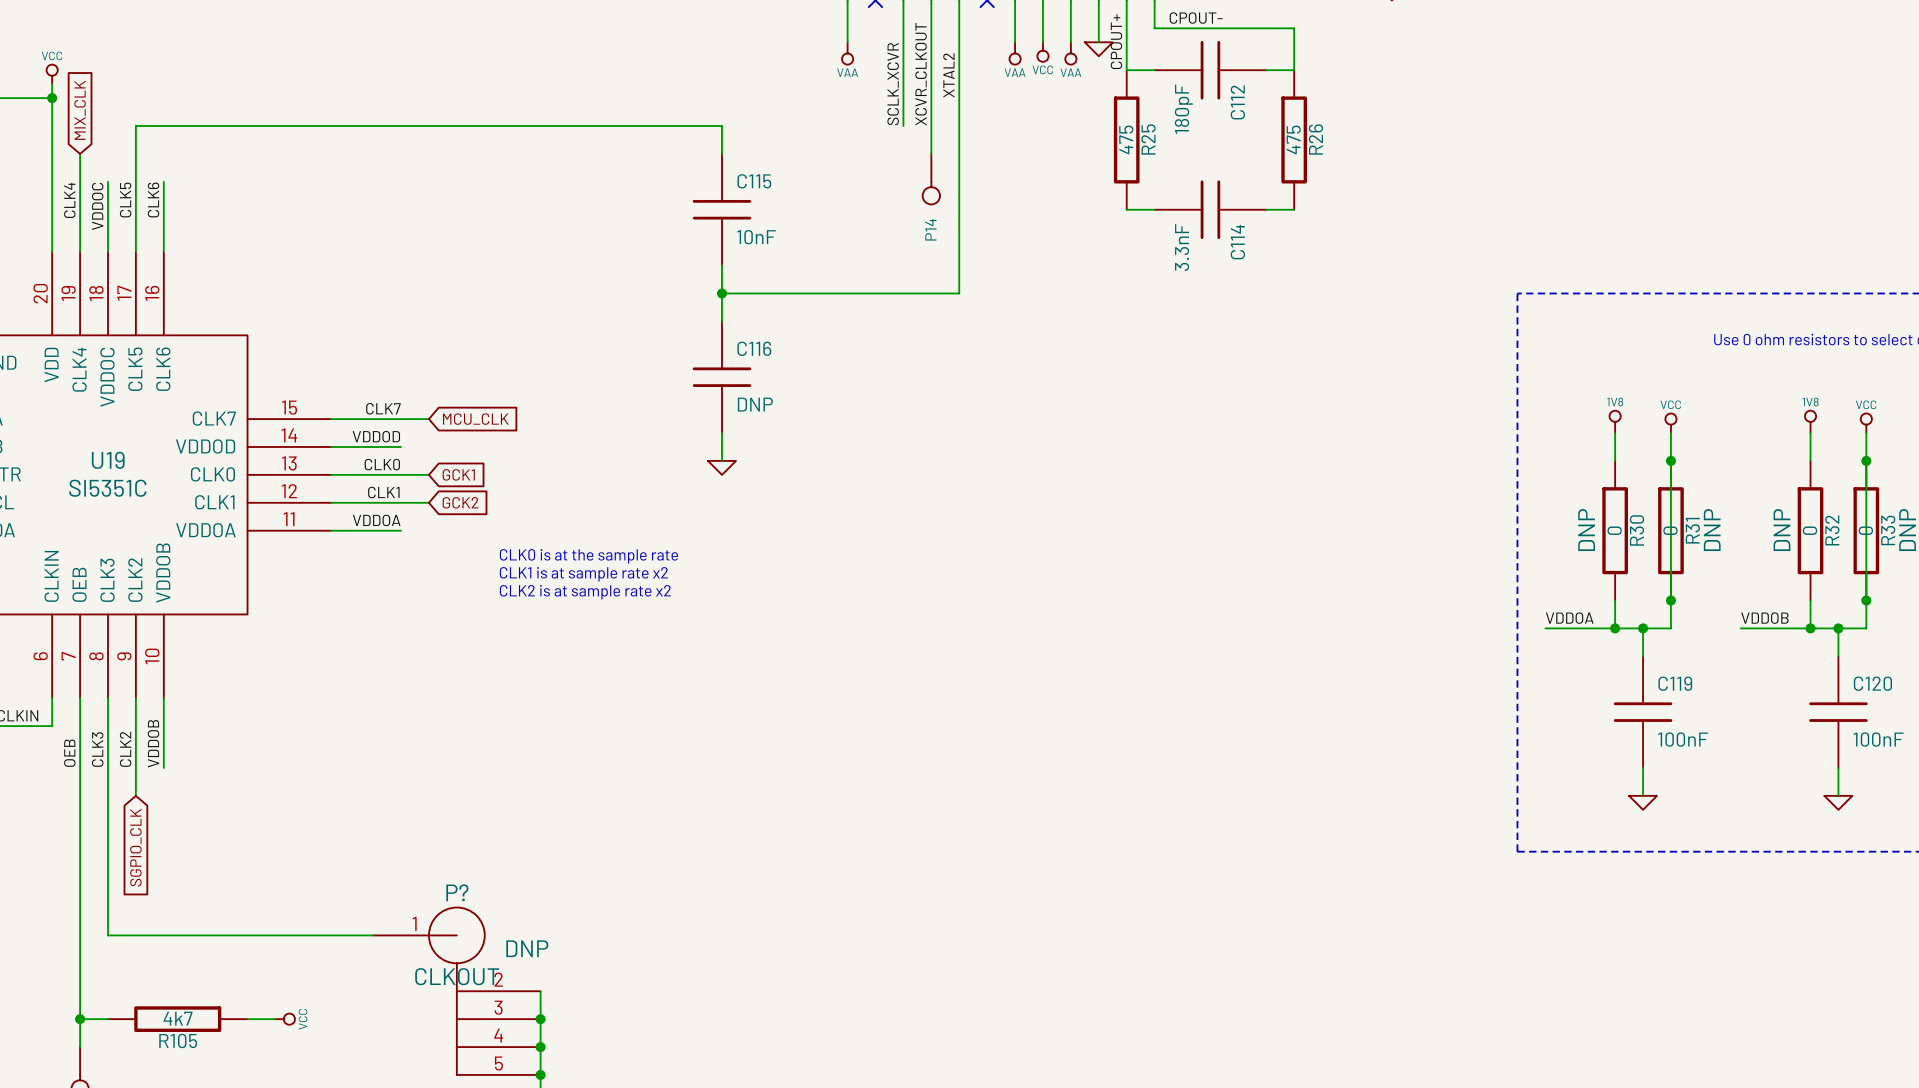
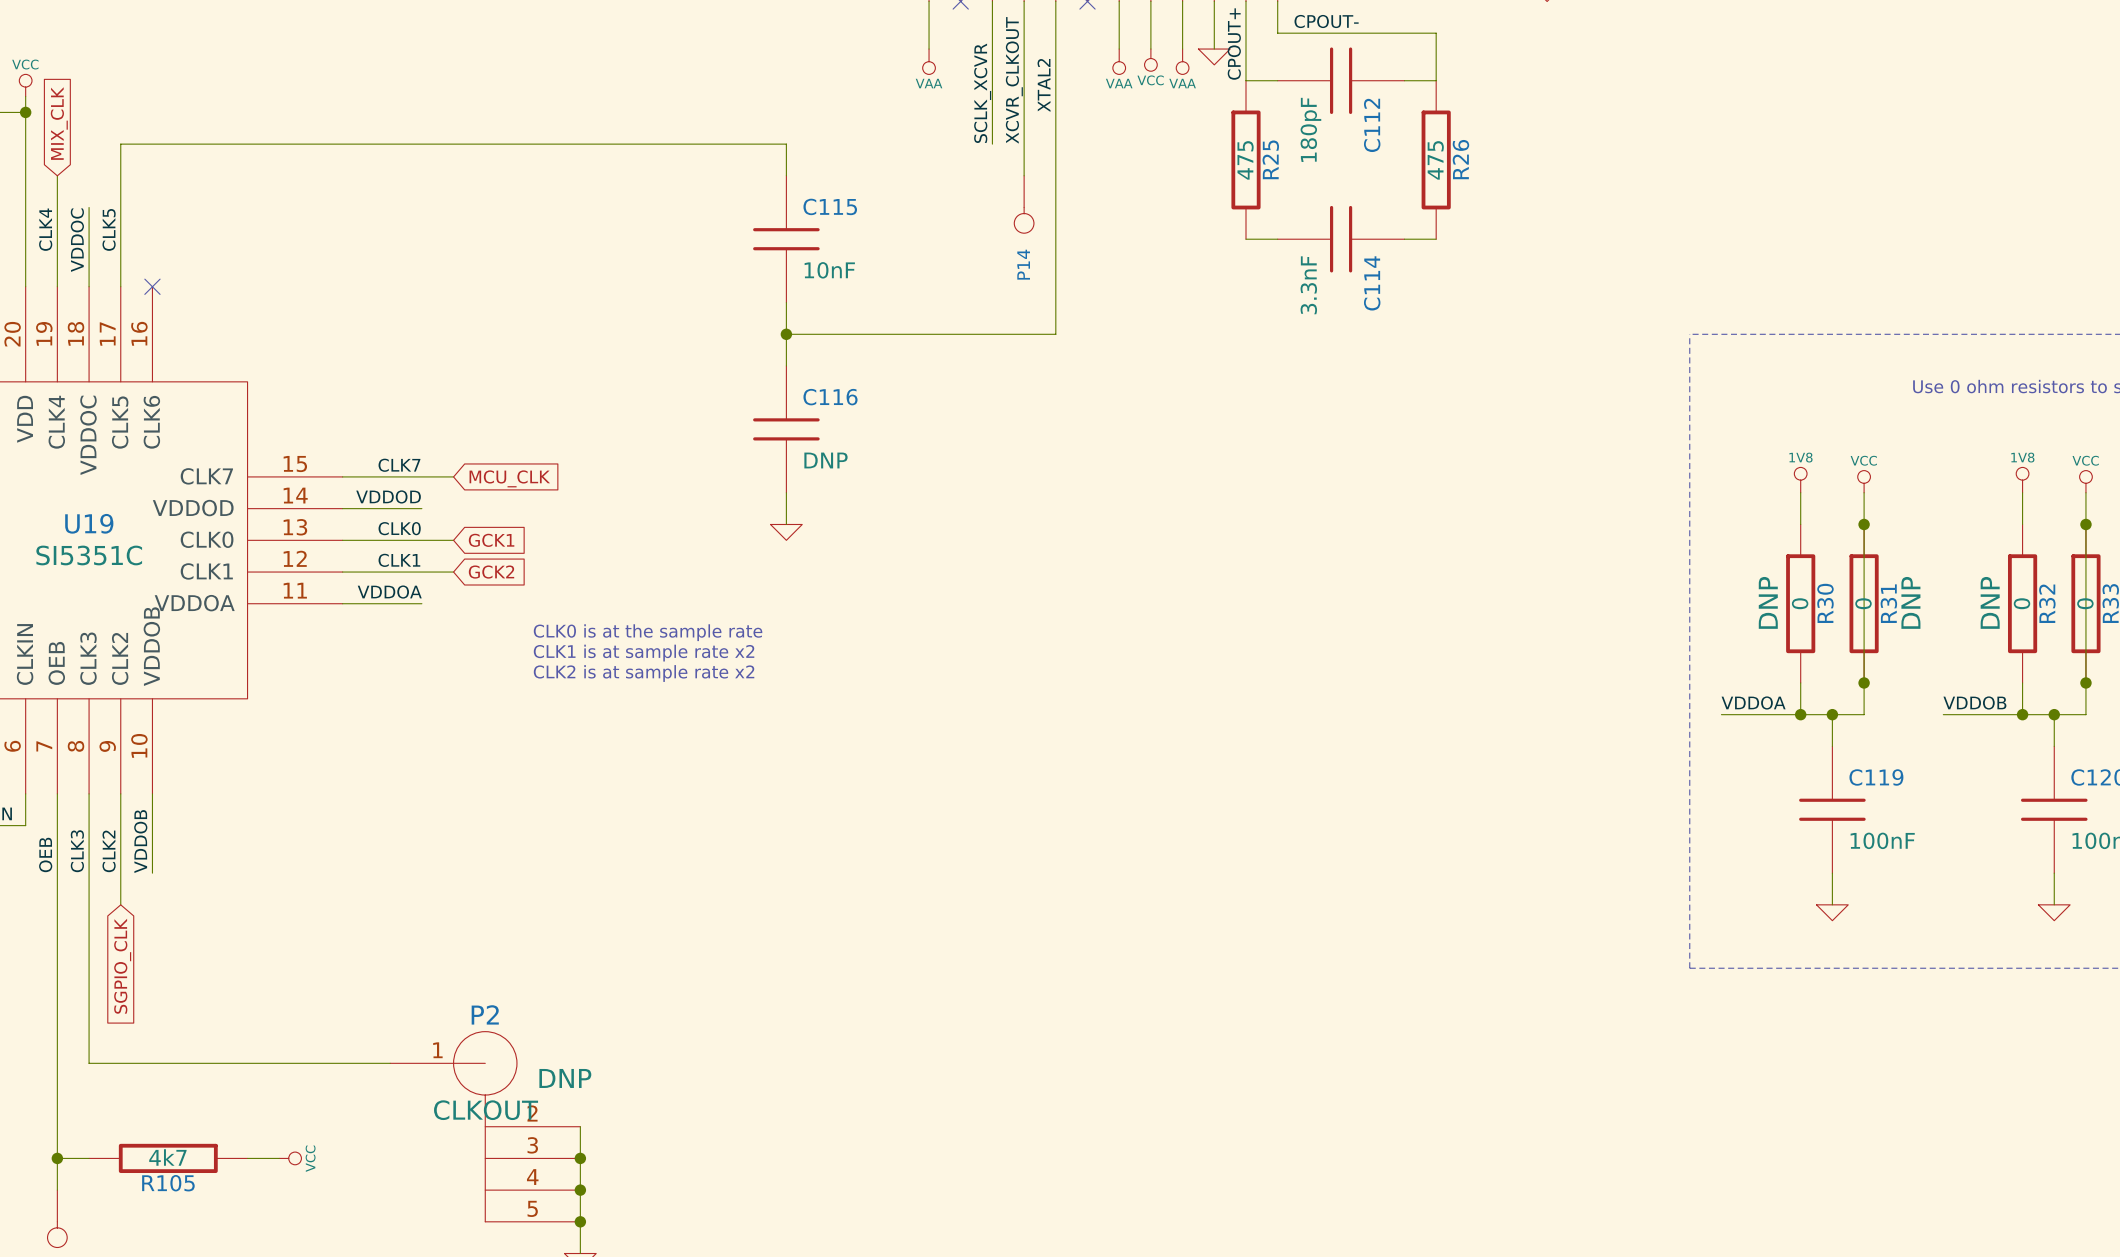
wire: (163, 181) (163, 251) -> none
label: CLK6 (153, 200) -> none
no-connect mark: none -> (152, 286)
P? name: P? (457, 892) -> P2 (485, 1014)

